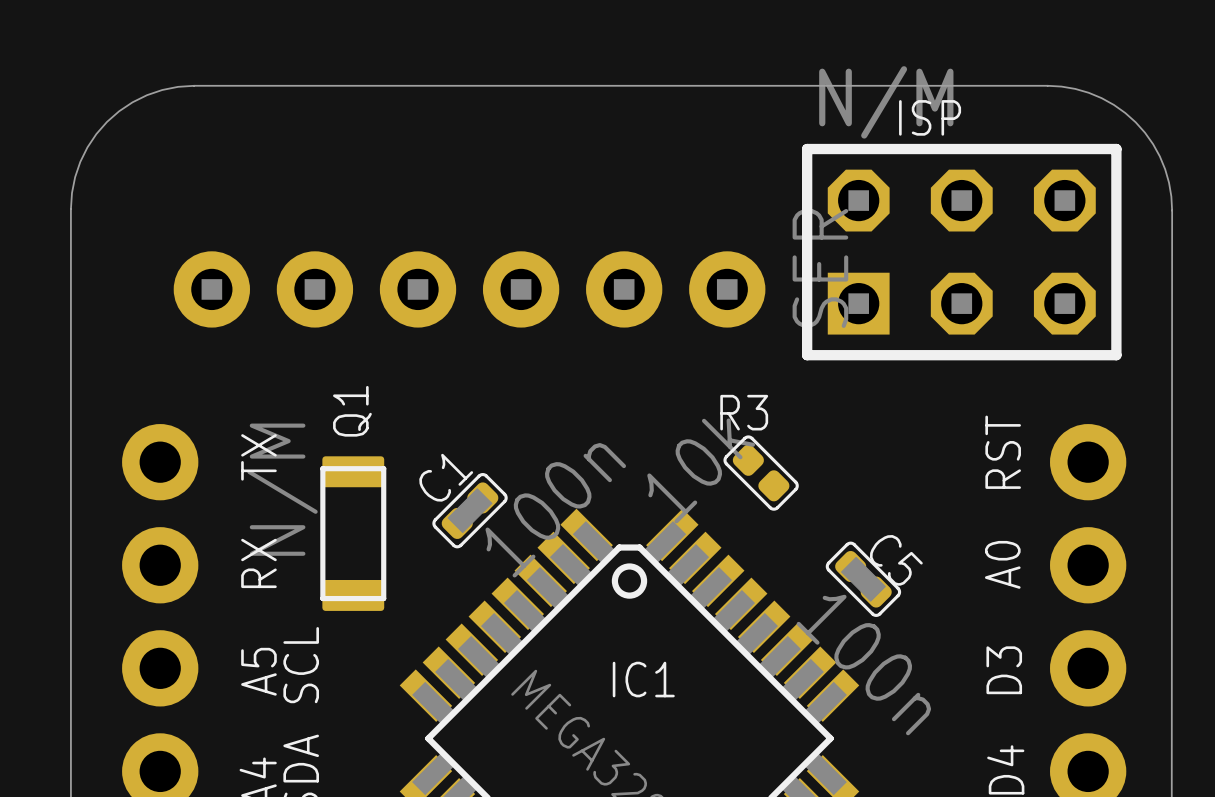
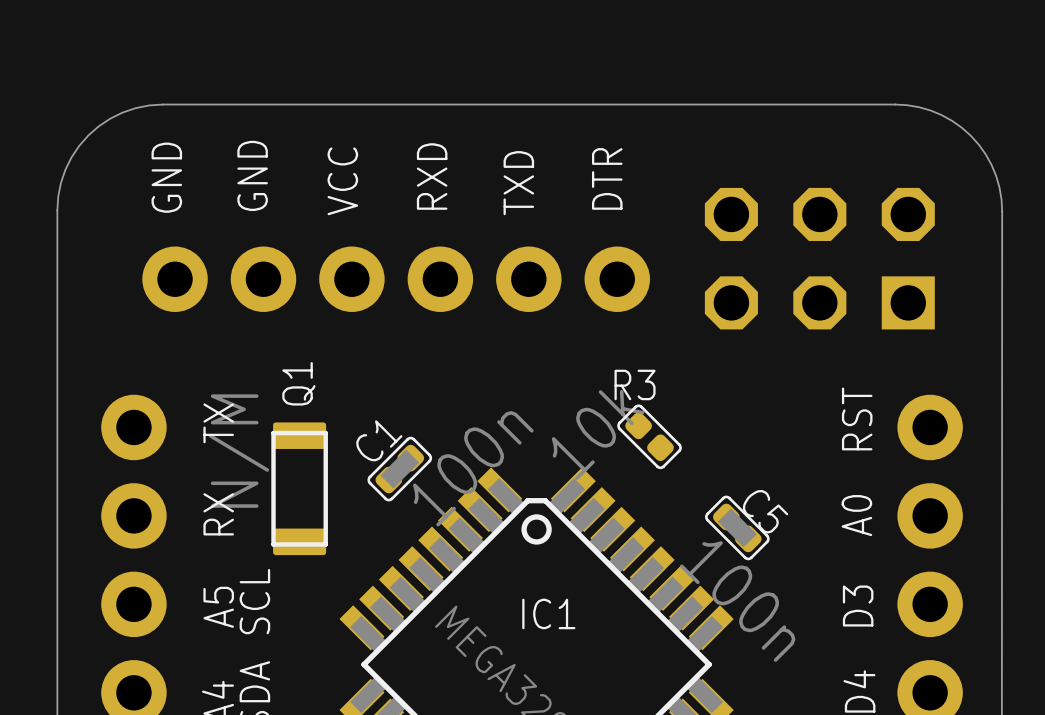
text: ISP (930, 117) -> none
text: none -> GND (252, 175)
text: none -> RXD (432, 176)
text: none -> GND (166, 177)
text: none -> DTR (607, 178)
text: none -> VCC (342, 181)
text: none -> TXD (518, 183)
part side: bottom (961, 252) -> top (819, 258)
part side: bottom (469, 289) -> top (396, 279)

